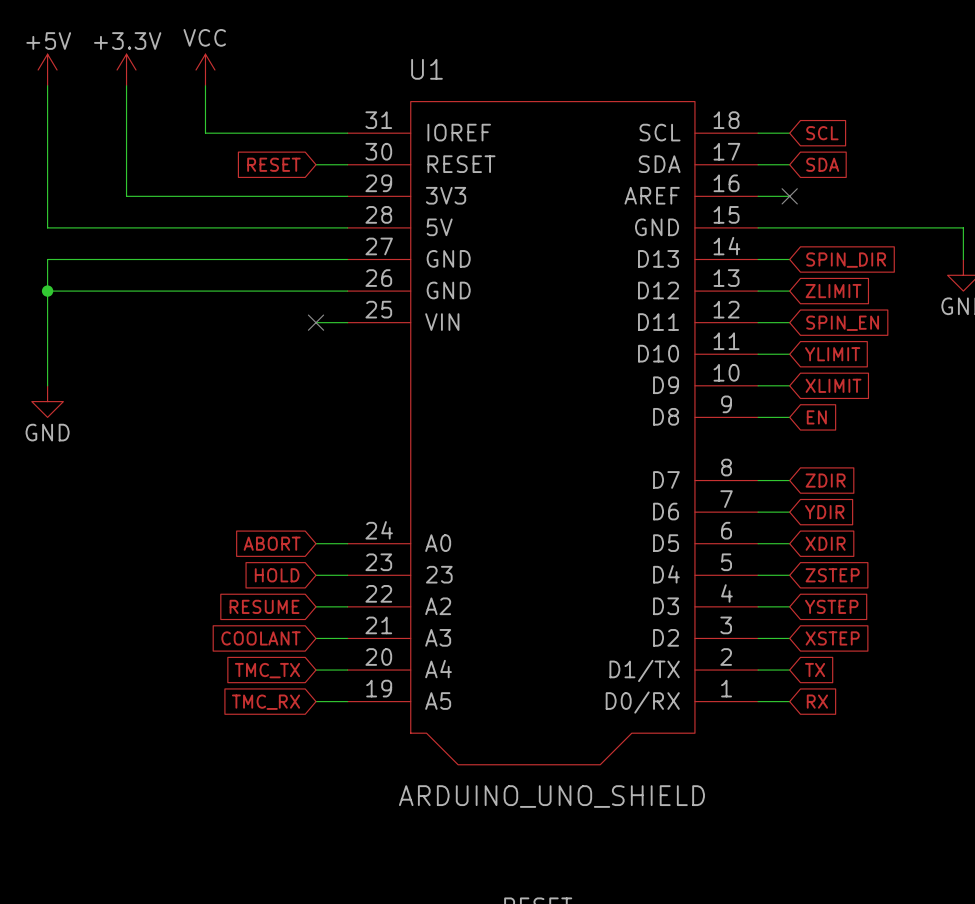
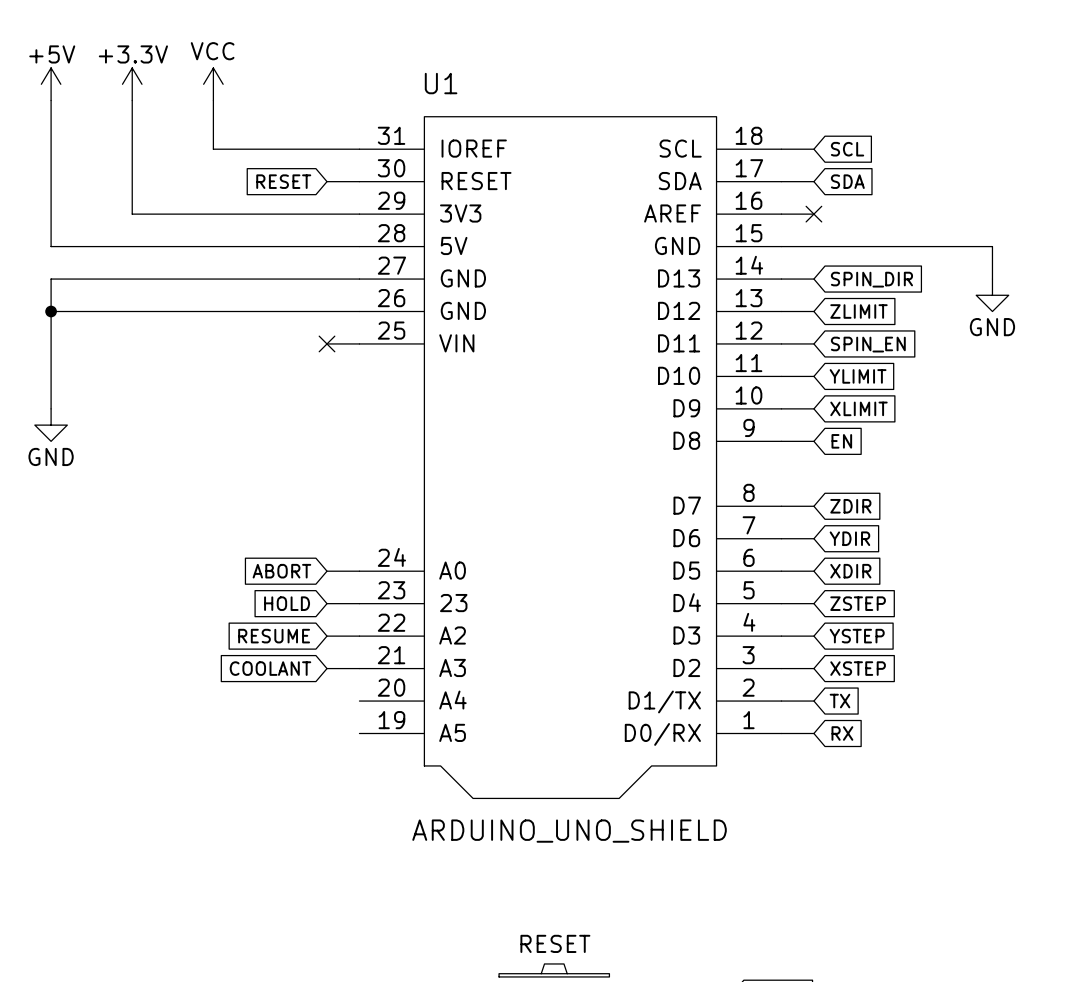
global label: TMC_TX (267, 670) -> none
wire: (316, 670) (347, 670) -> none
wire: (316, 701) (347, 701) -> none
global label: TMC_RX (266, 702) -> none

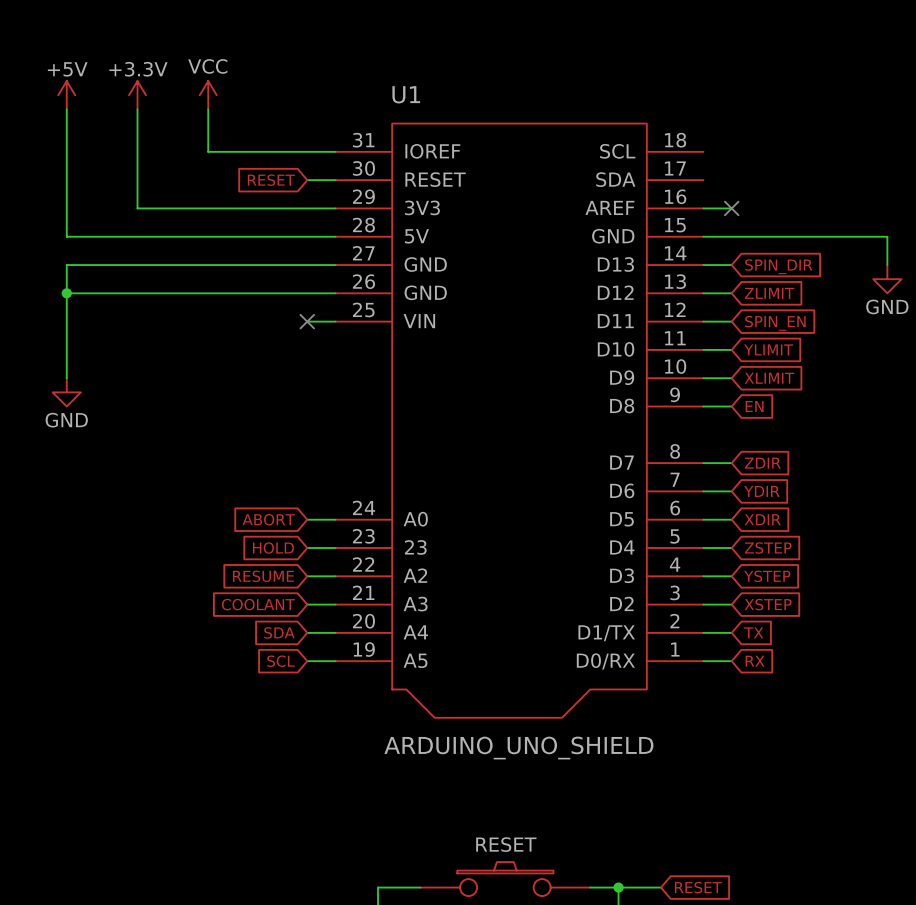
wire: (781, 149) (813, 149) -> none
global label: SCL (847, 149) -> none
wire: (781, 181) (813, 181) -> none
global label: SDA (847, 181) -> none
global label: none -> SDA (279, 632)
wire: none -> (307, 632) (335, 632)
global label: none -> SCL (281, 661)
wire: none -> (307, 661) (335, 661)

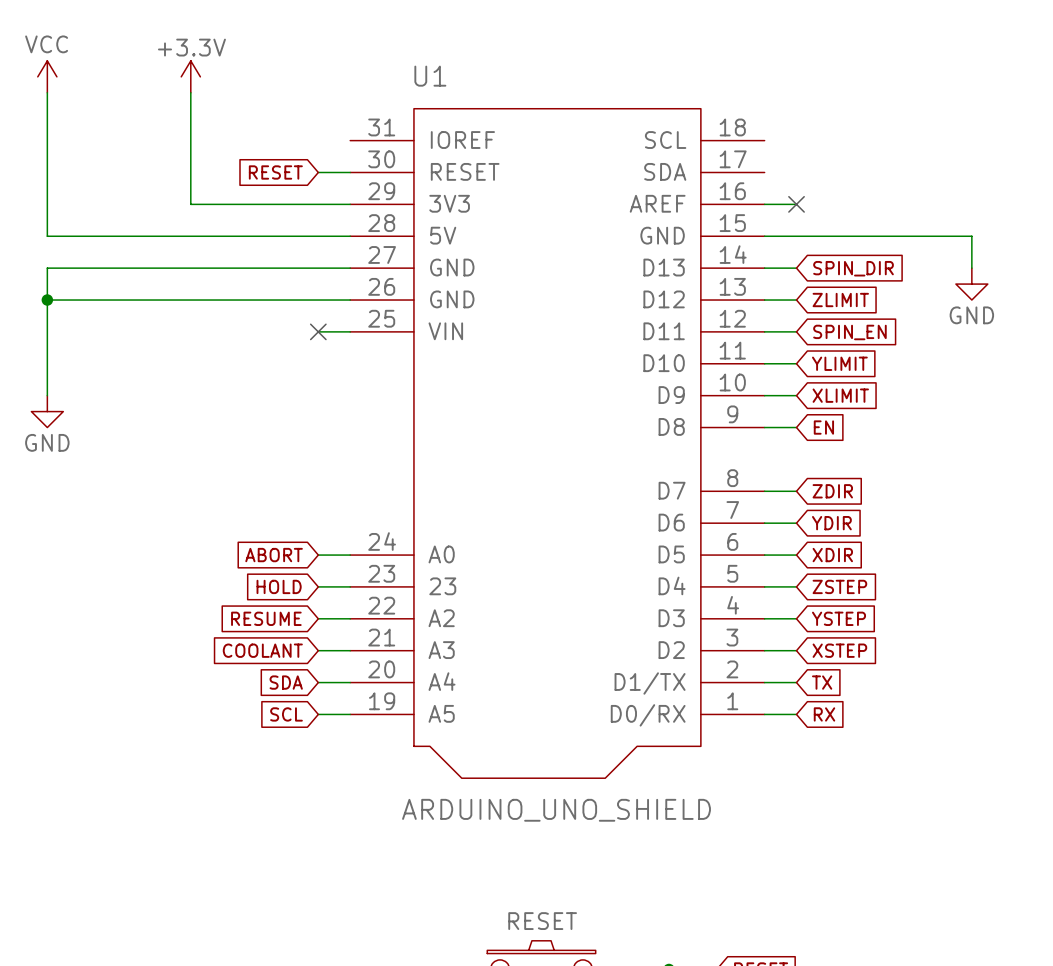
power symbol: +5V (66, 95) -> VCC (47, 76)
power symbol position: +3.3V (137, 95) -> +3.3V (190, 76)
power symbol: VCC (208, 95) -> none
wire: (137, 109) (137, 208) (194, 208) -> (190, 92) (190, 204)
wire: (208, 109) (208, 151) (335, 151) -> none

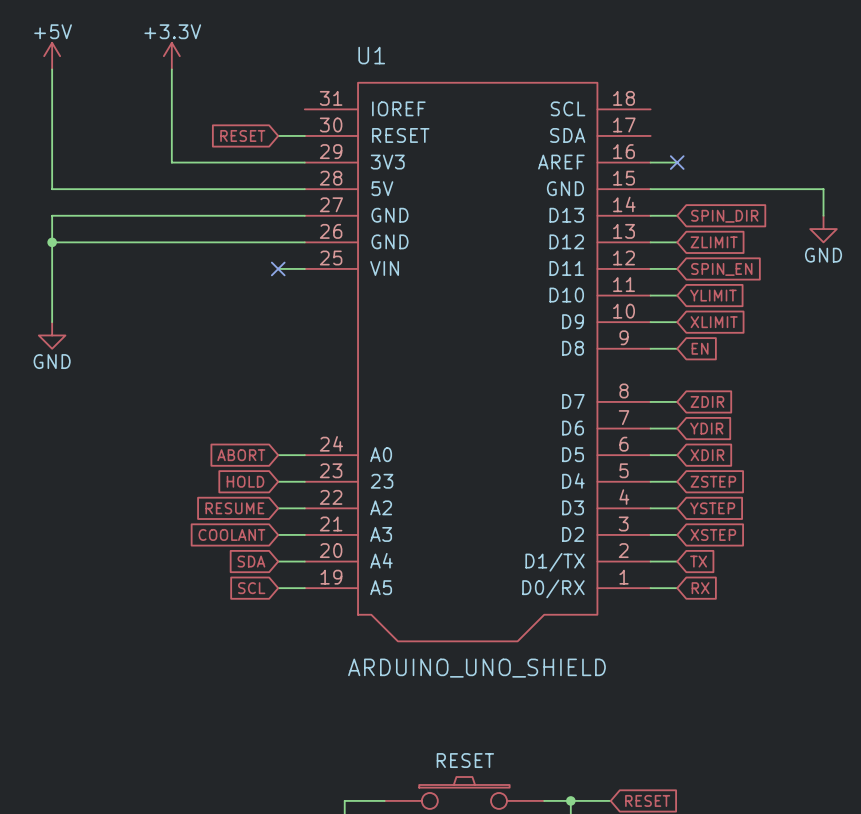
power symbol: VCC (47, 76) -> +5V (52, 56)

